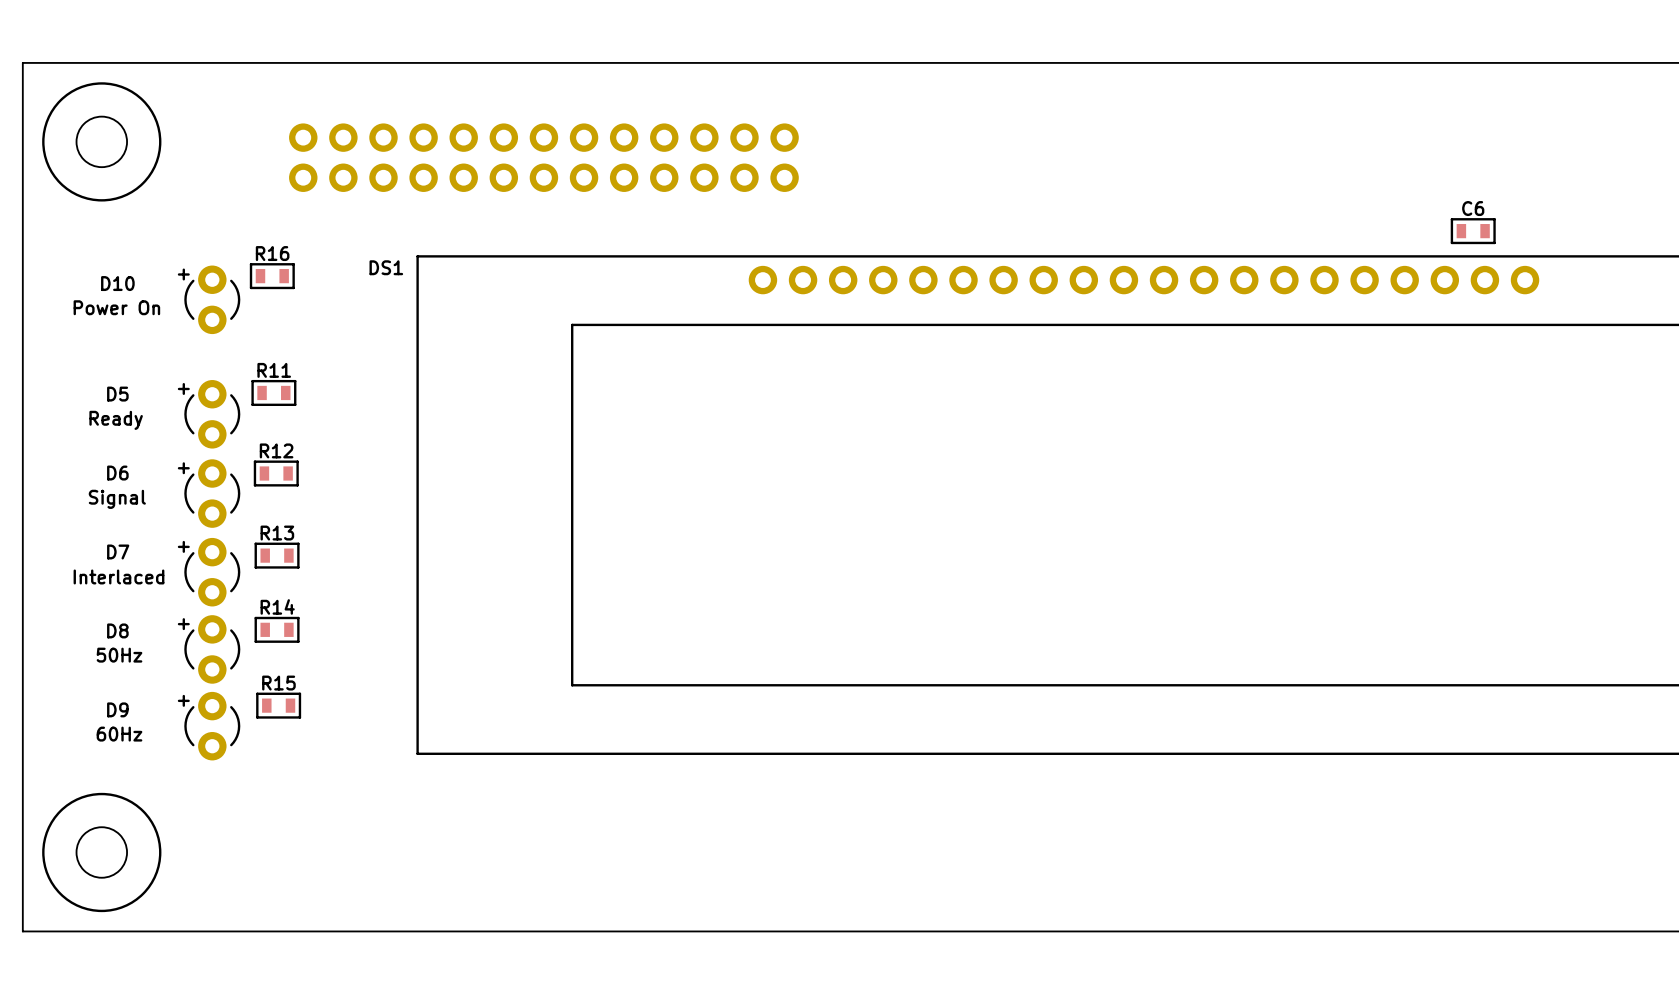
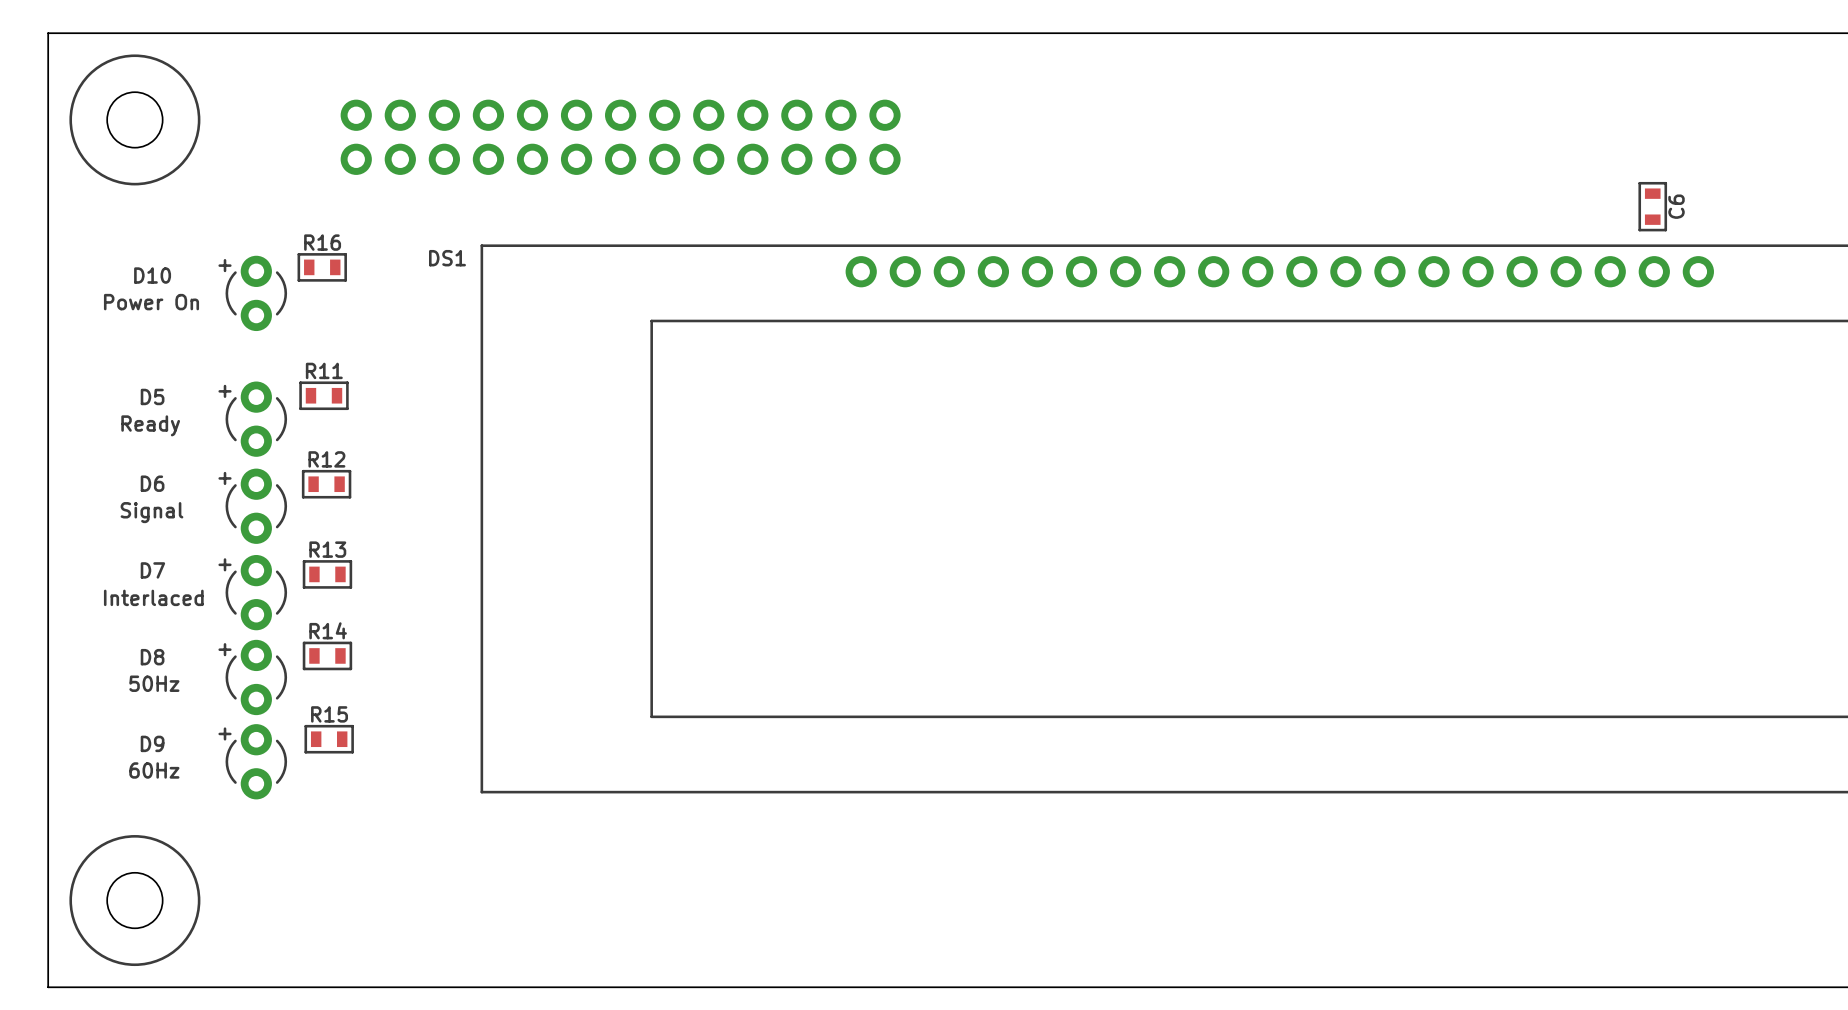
C6 rotation: 0° (1473, 231) -> 90° clockwise (1652, 206)

